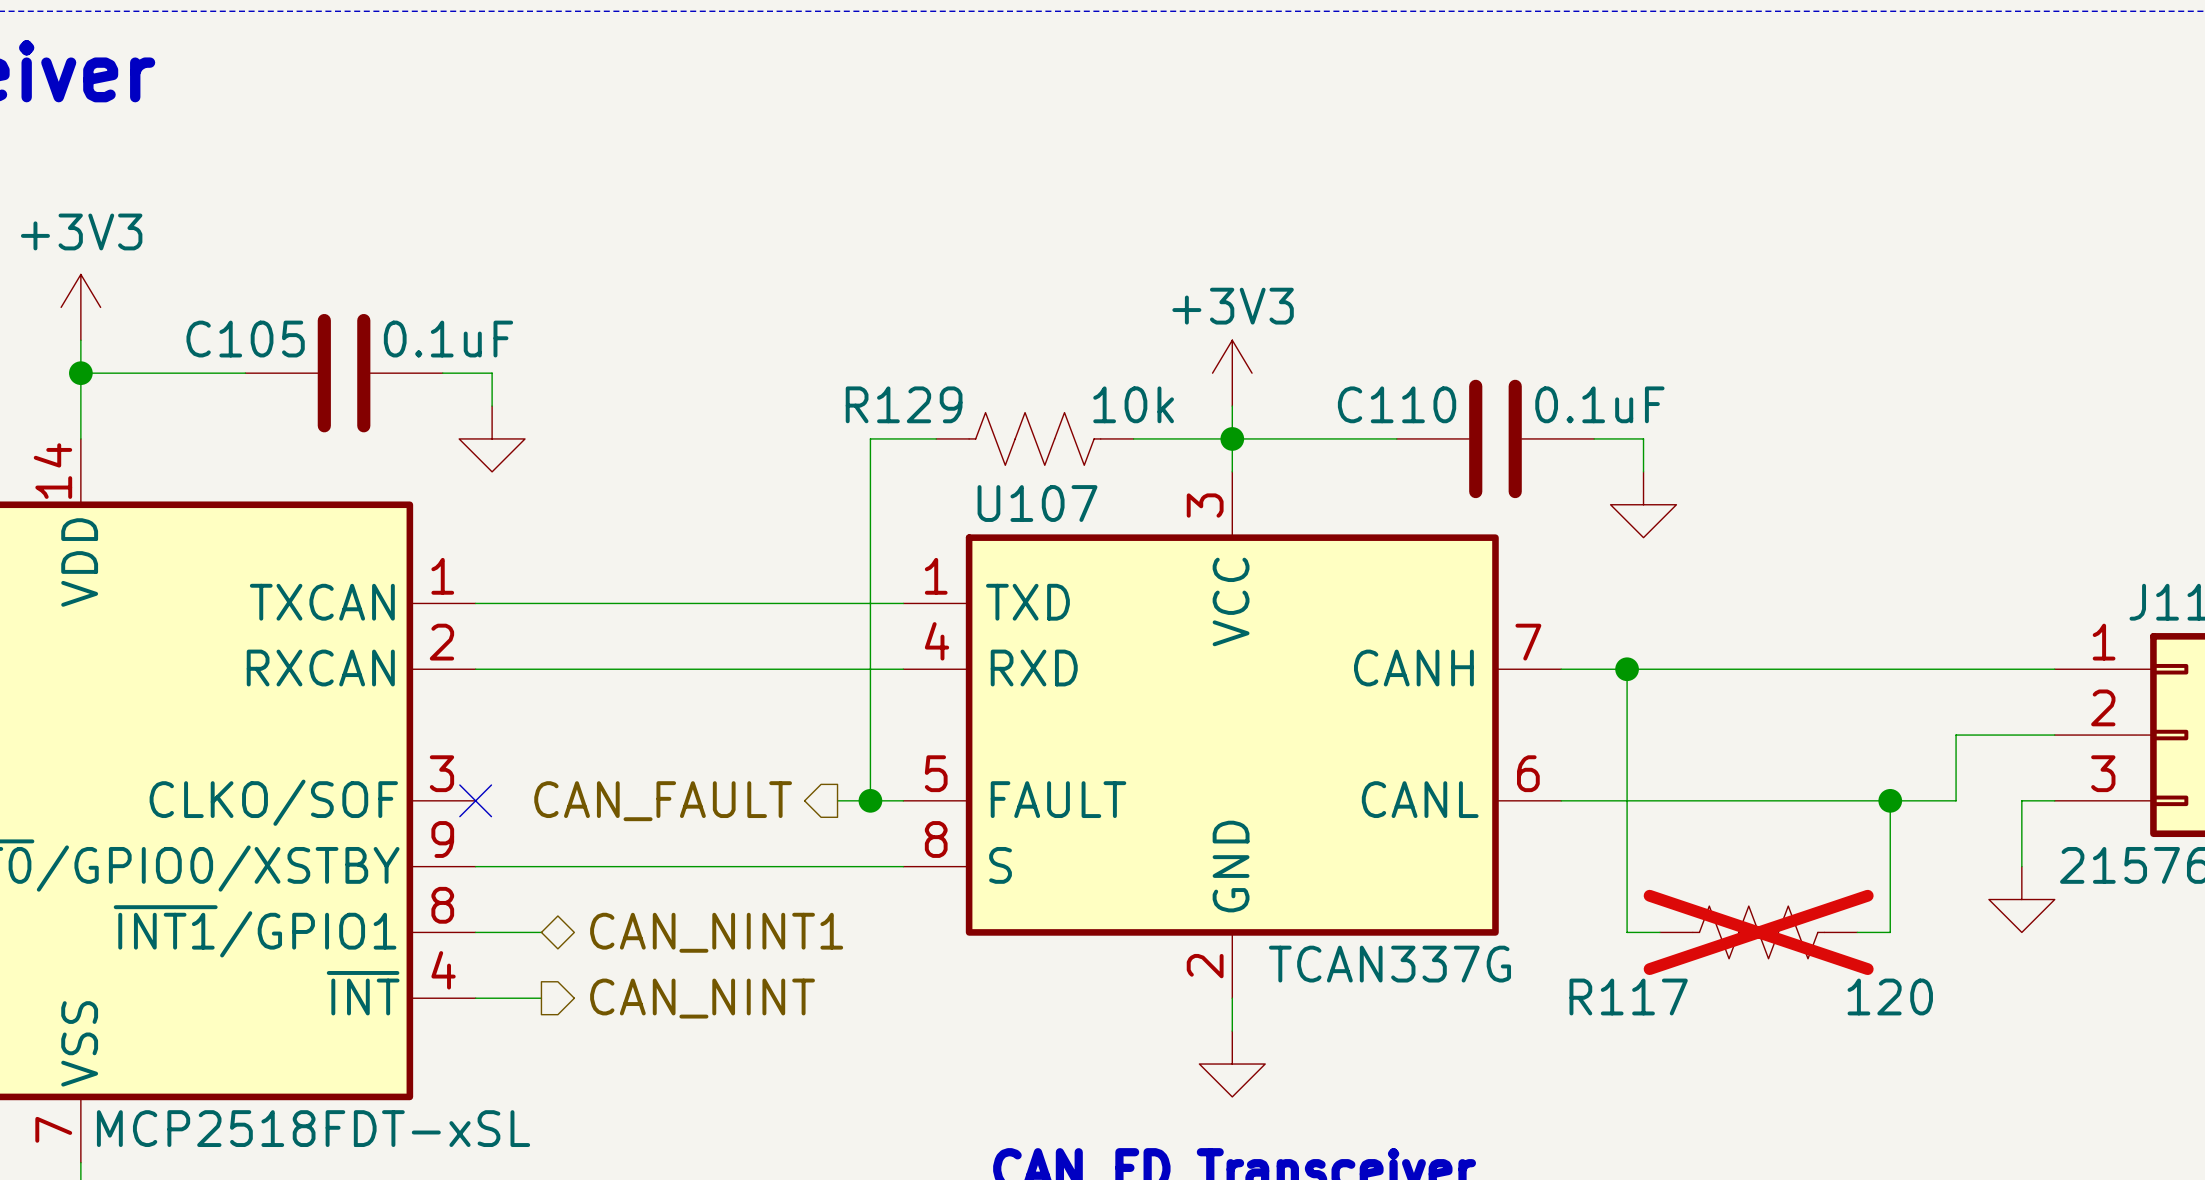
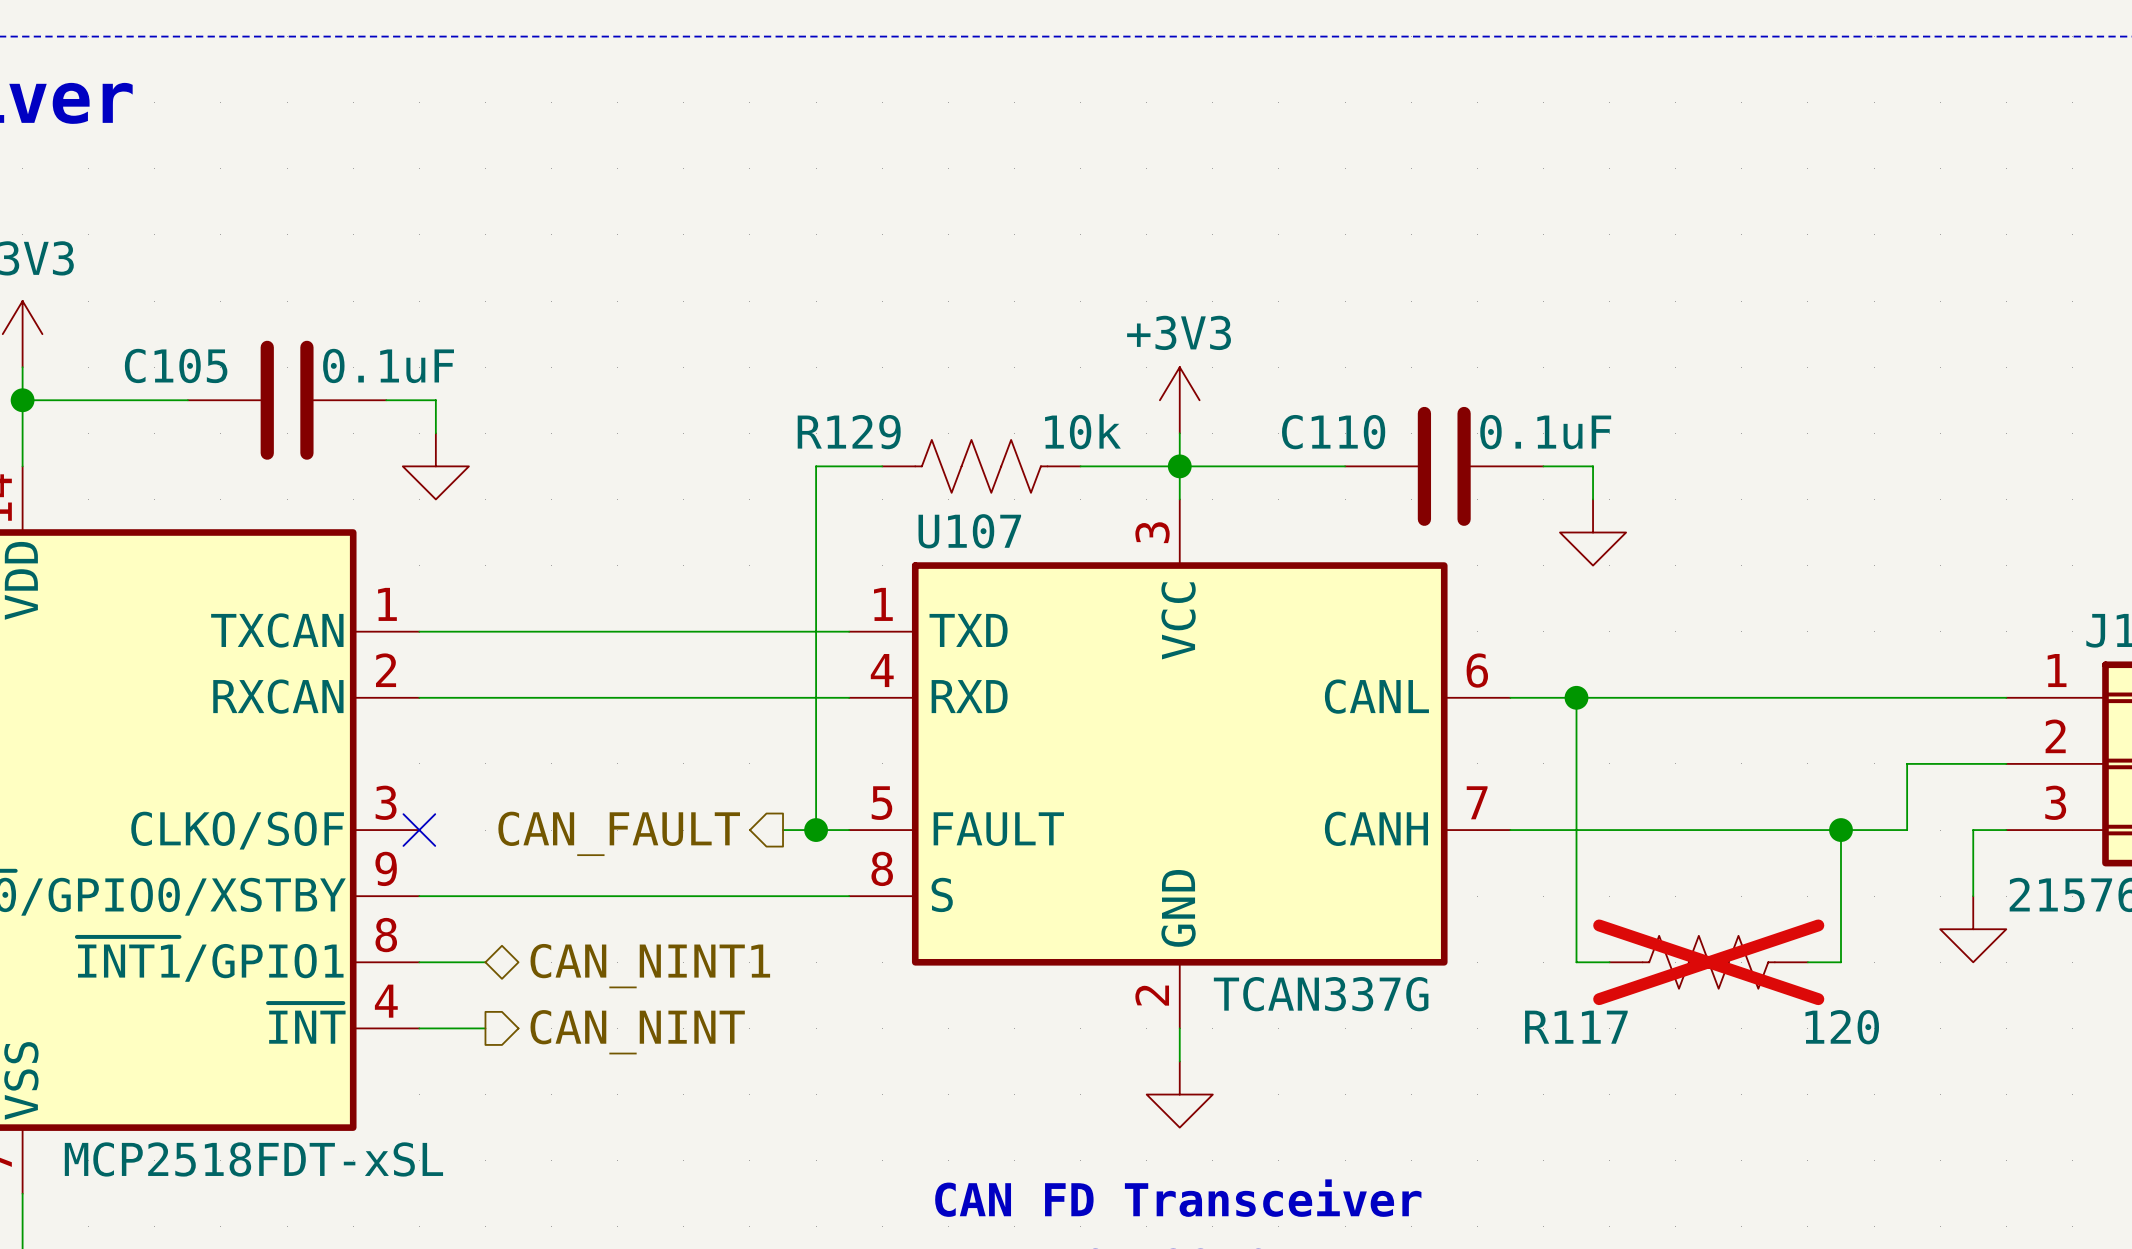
U107 pin number: 7 (1528, 642) -> 6 (1477, 670)
U107 pin name: CANH (1413, 668) -> CANL (1376, 696)
U107 pin number: 6 (1528, 773) -> 7 (1477, 802)
U107 pin name: CANL (1420, 799) -> CANH (1376, 828)

